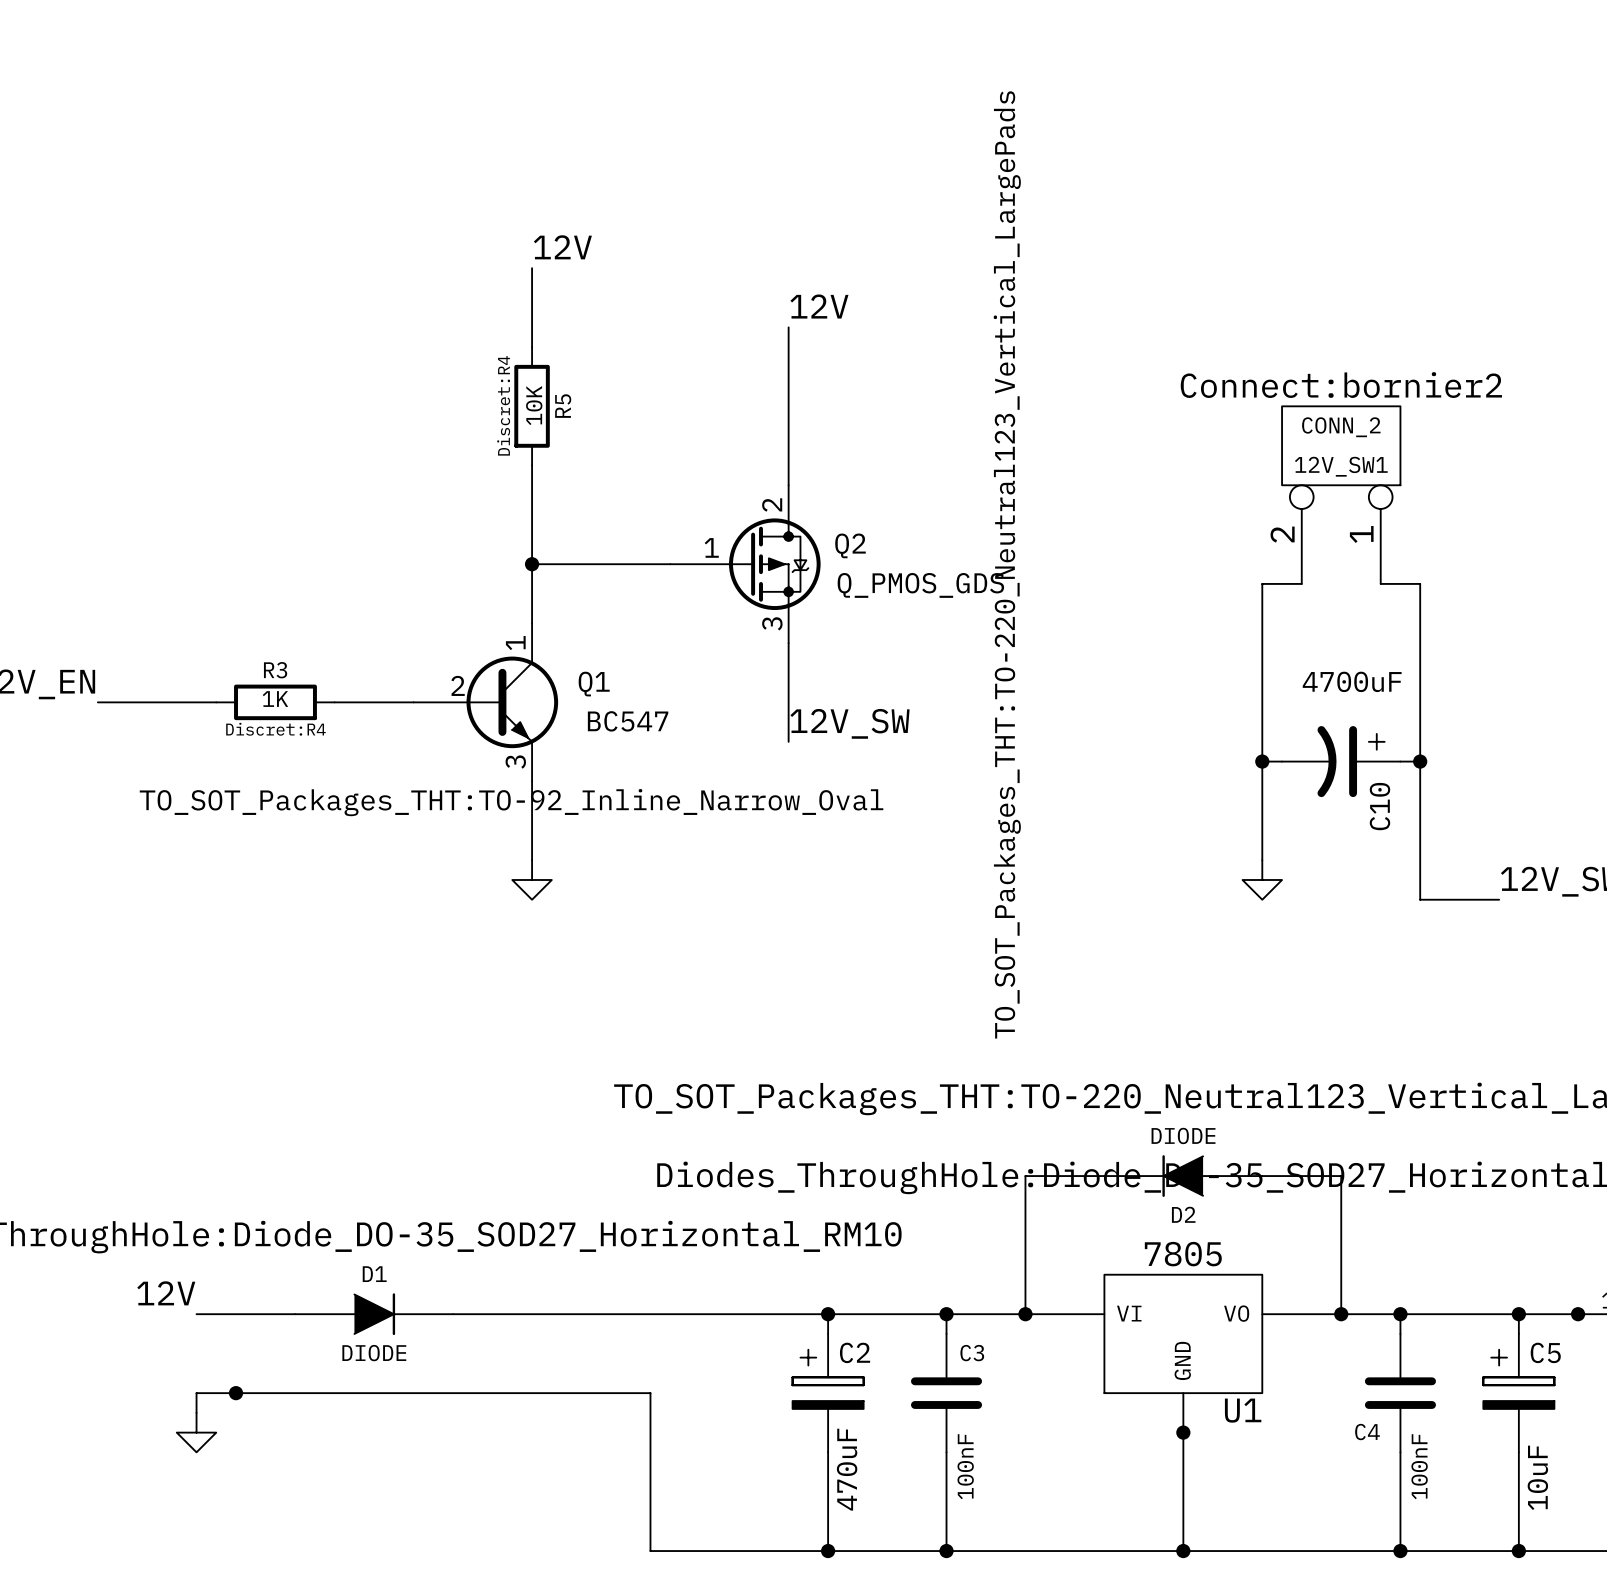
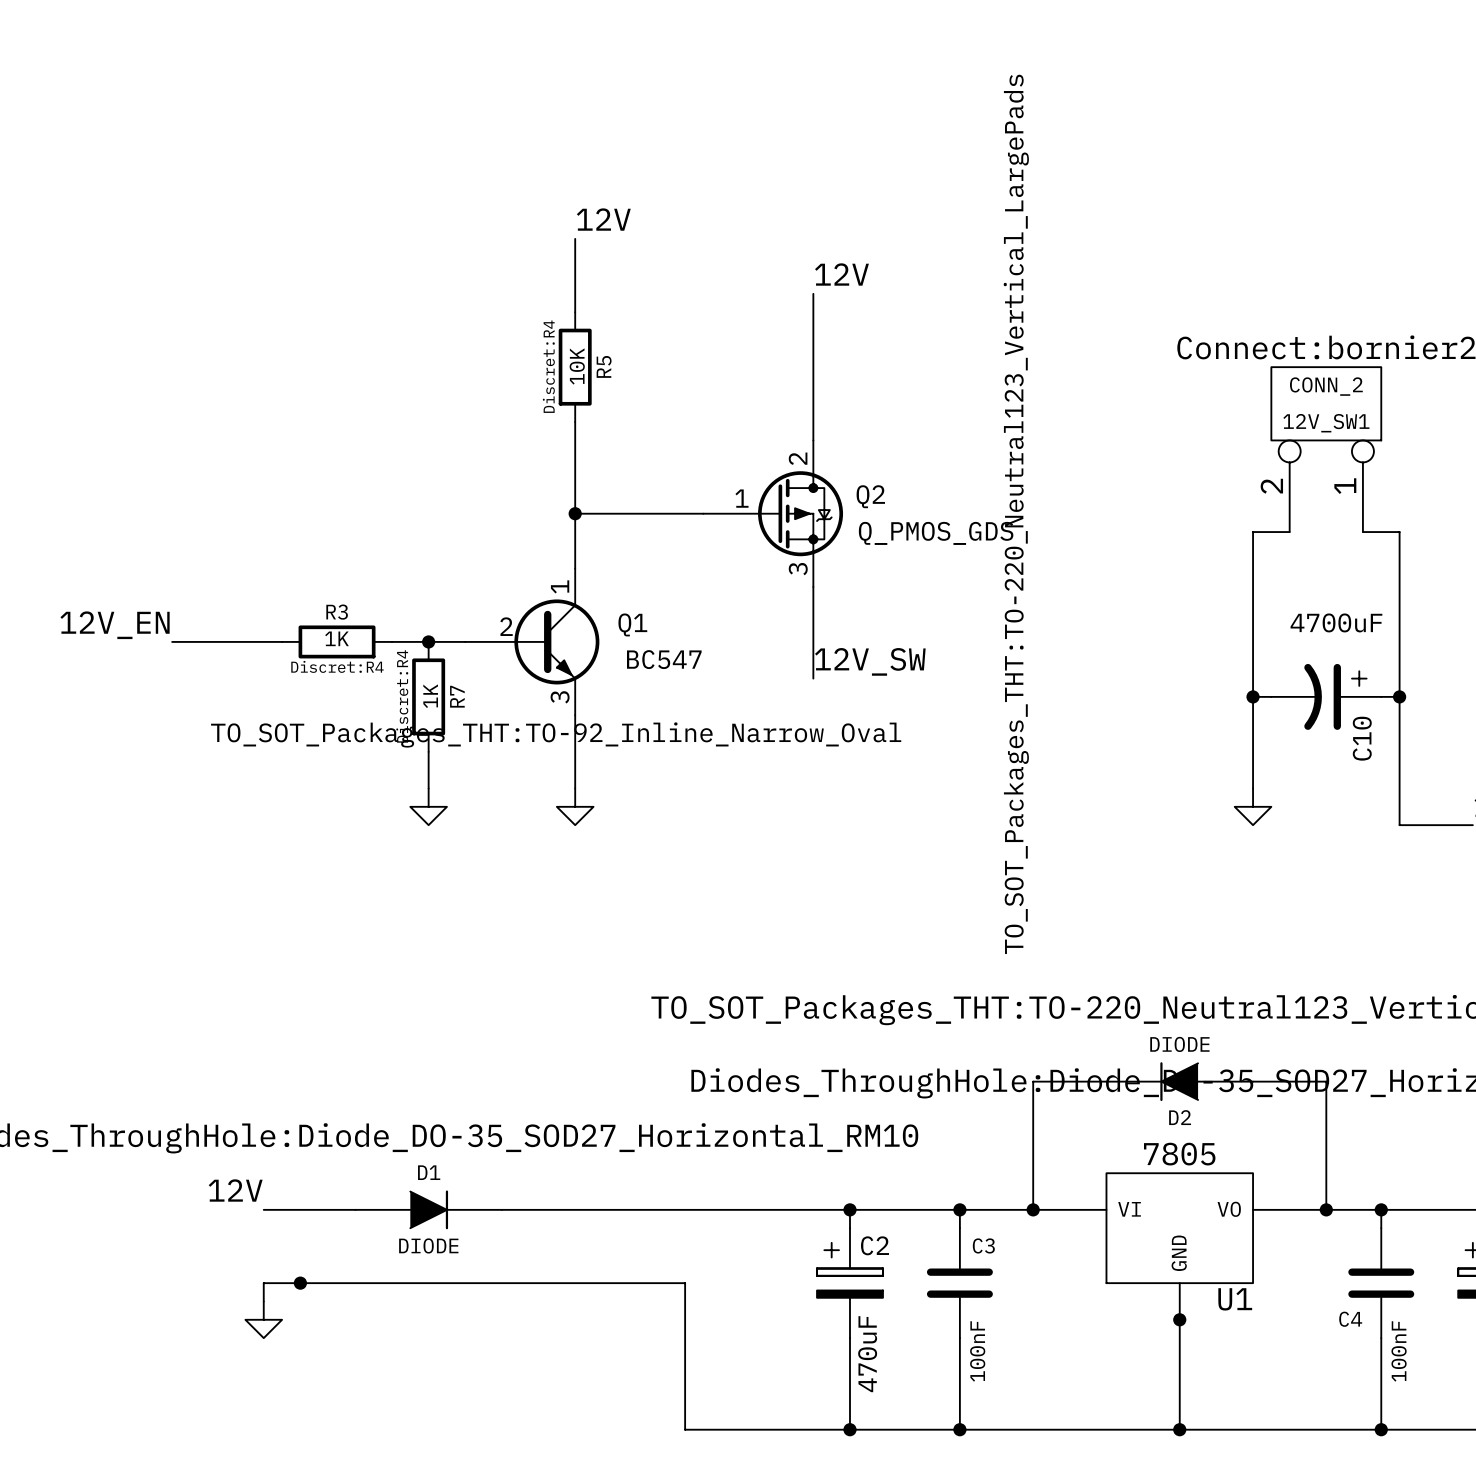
junction: none -> (428, 641)
R7: none -> 1K (428, 696)
wire: none -> (428, 751) (428, 788)
power symbol: none -> (428, 806)

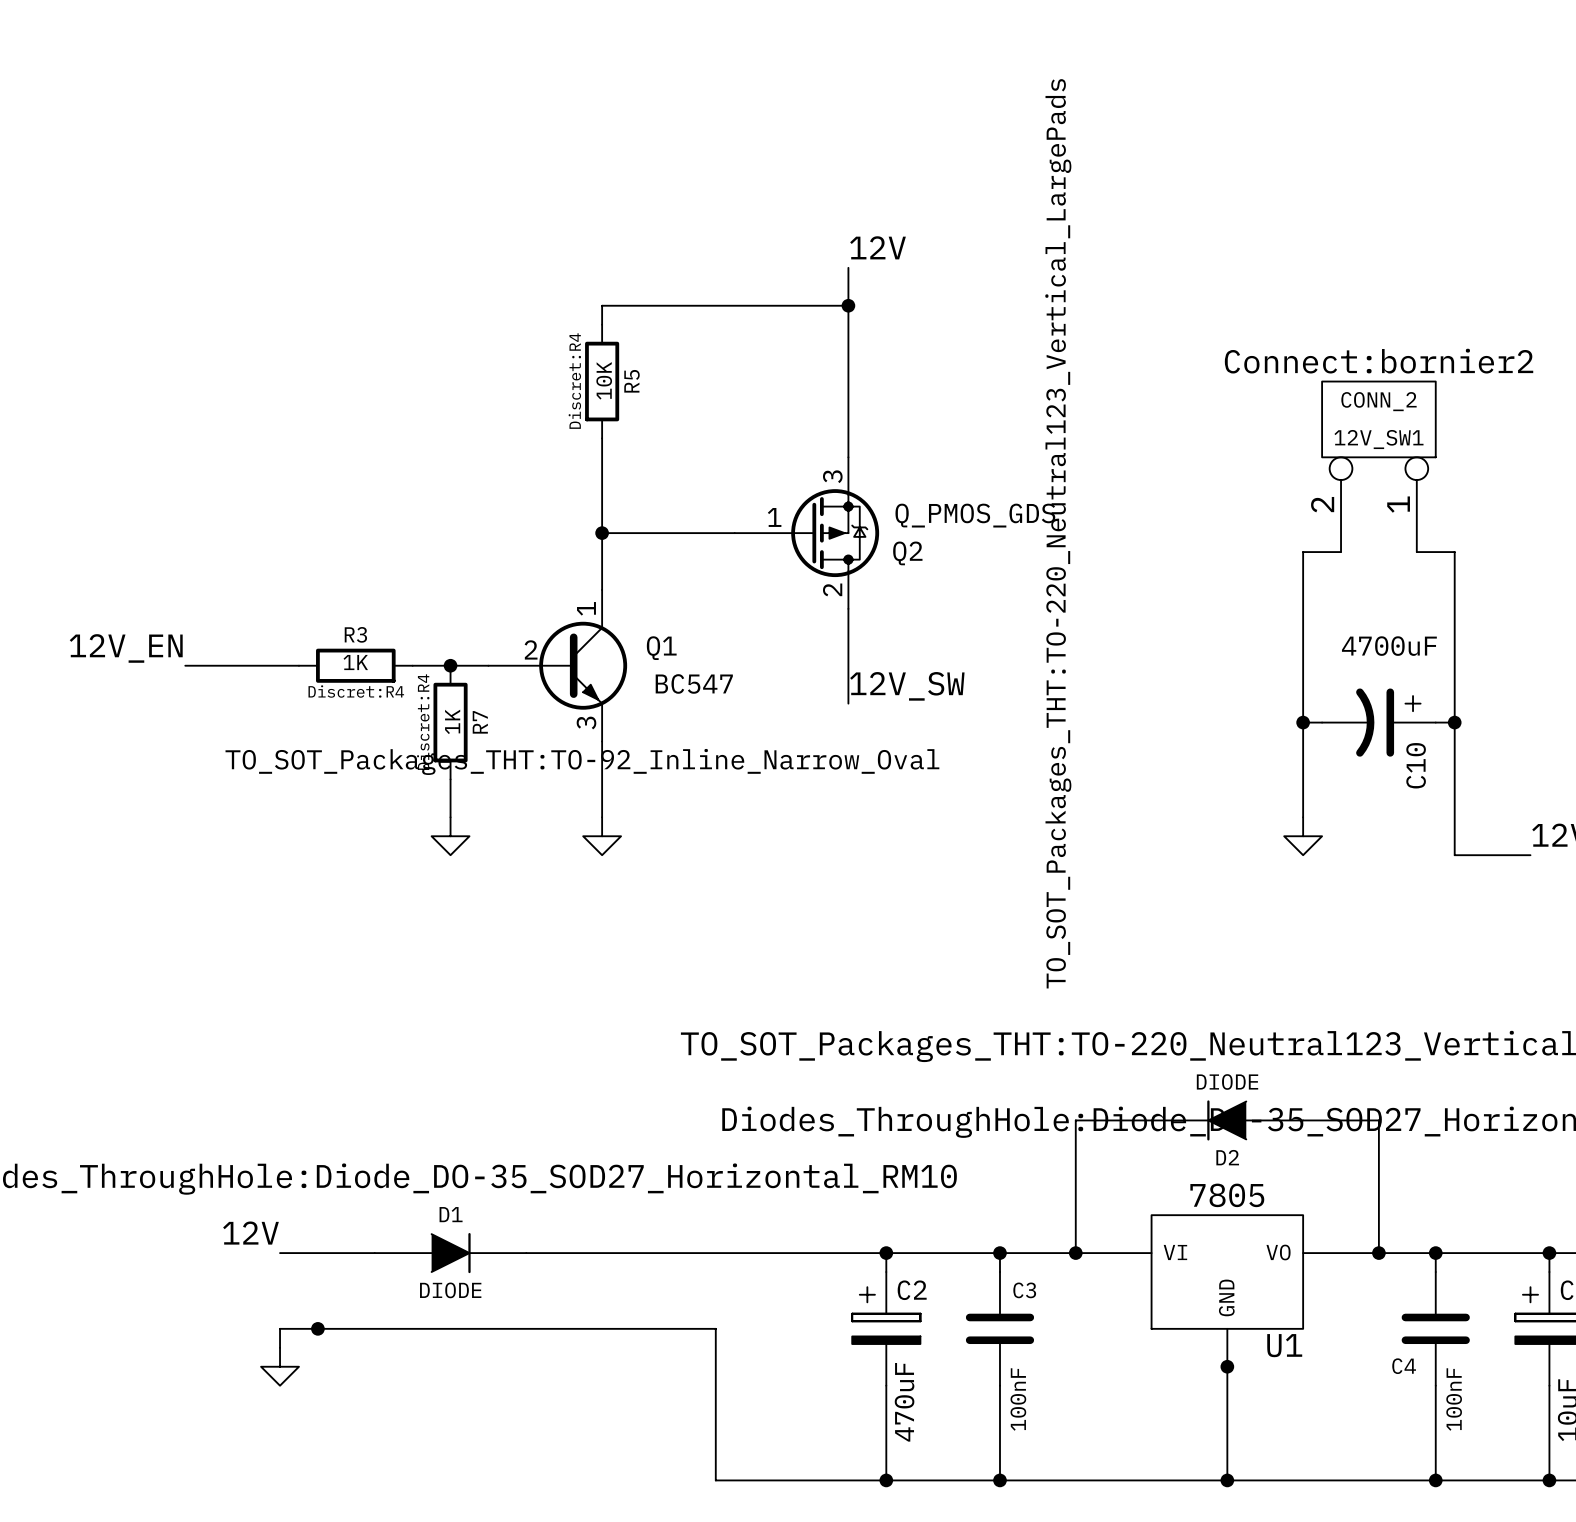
label: 12V (603, 219) -> none
wire: (575, 238) (575, 293) -> (848, 267) (848, 305) (602, 305)
label position: 12V (841, 274) -> 12V (878, 247)
junction: none -> (848, 305)
Q2 flip: as is (800, 513) -> up-down (835, 533)

